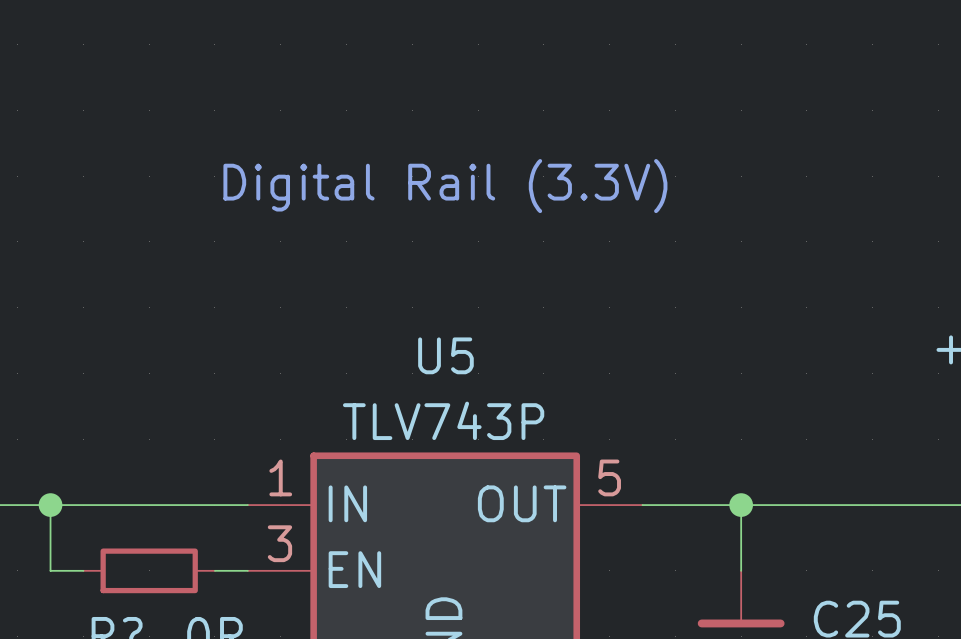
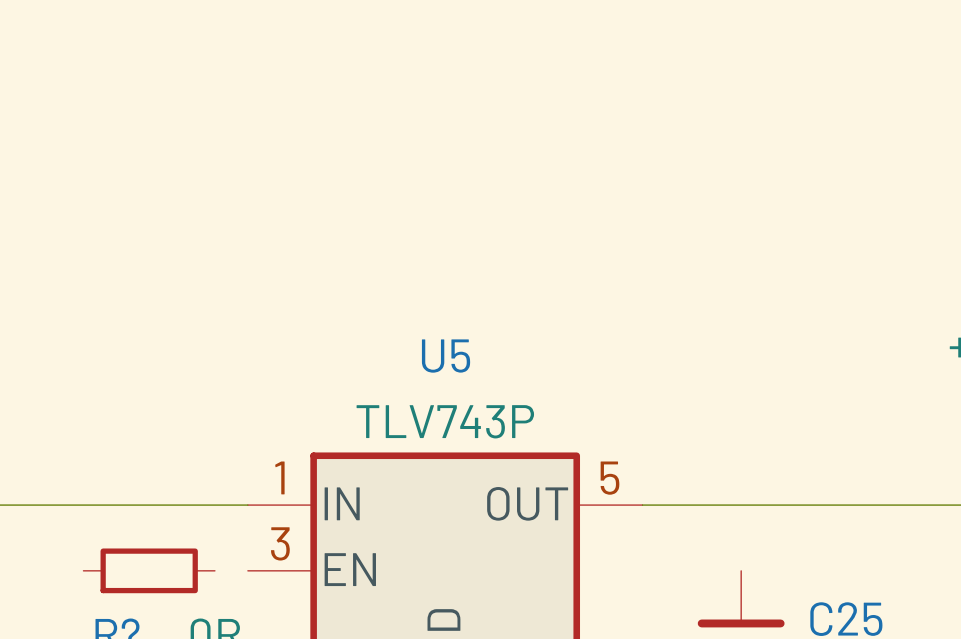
text: Digital Rail (3.3V) (445, 186) -> none
wire: (50, 505) (50, 570) (83, 570) -> none
junction: (50, 505) -> none
wire: (741, 505) (741, 570) -> none
junction: (741, 505) -> none
wire: (214, 570) (247, 570) -> none

